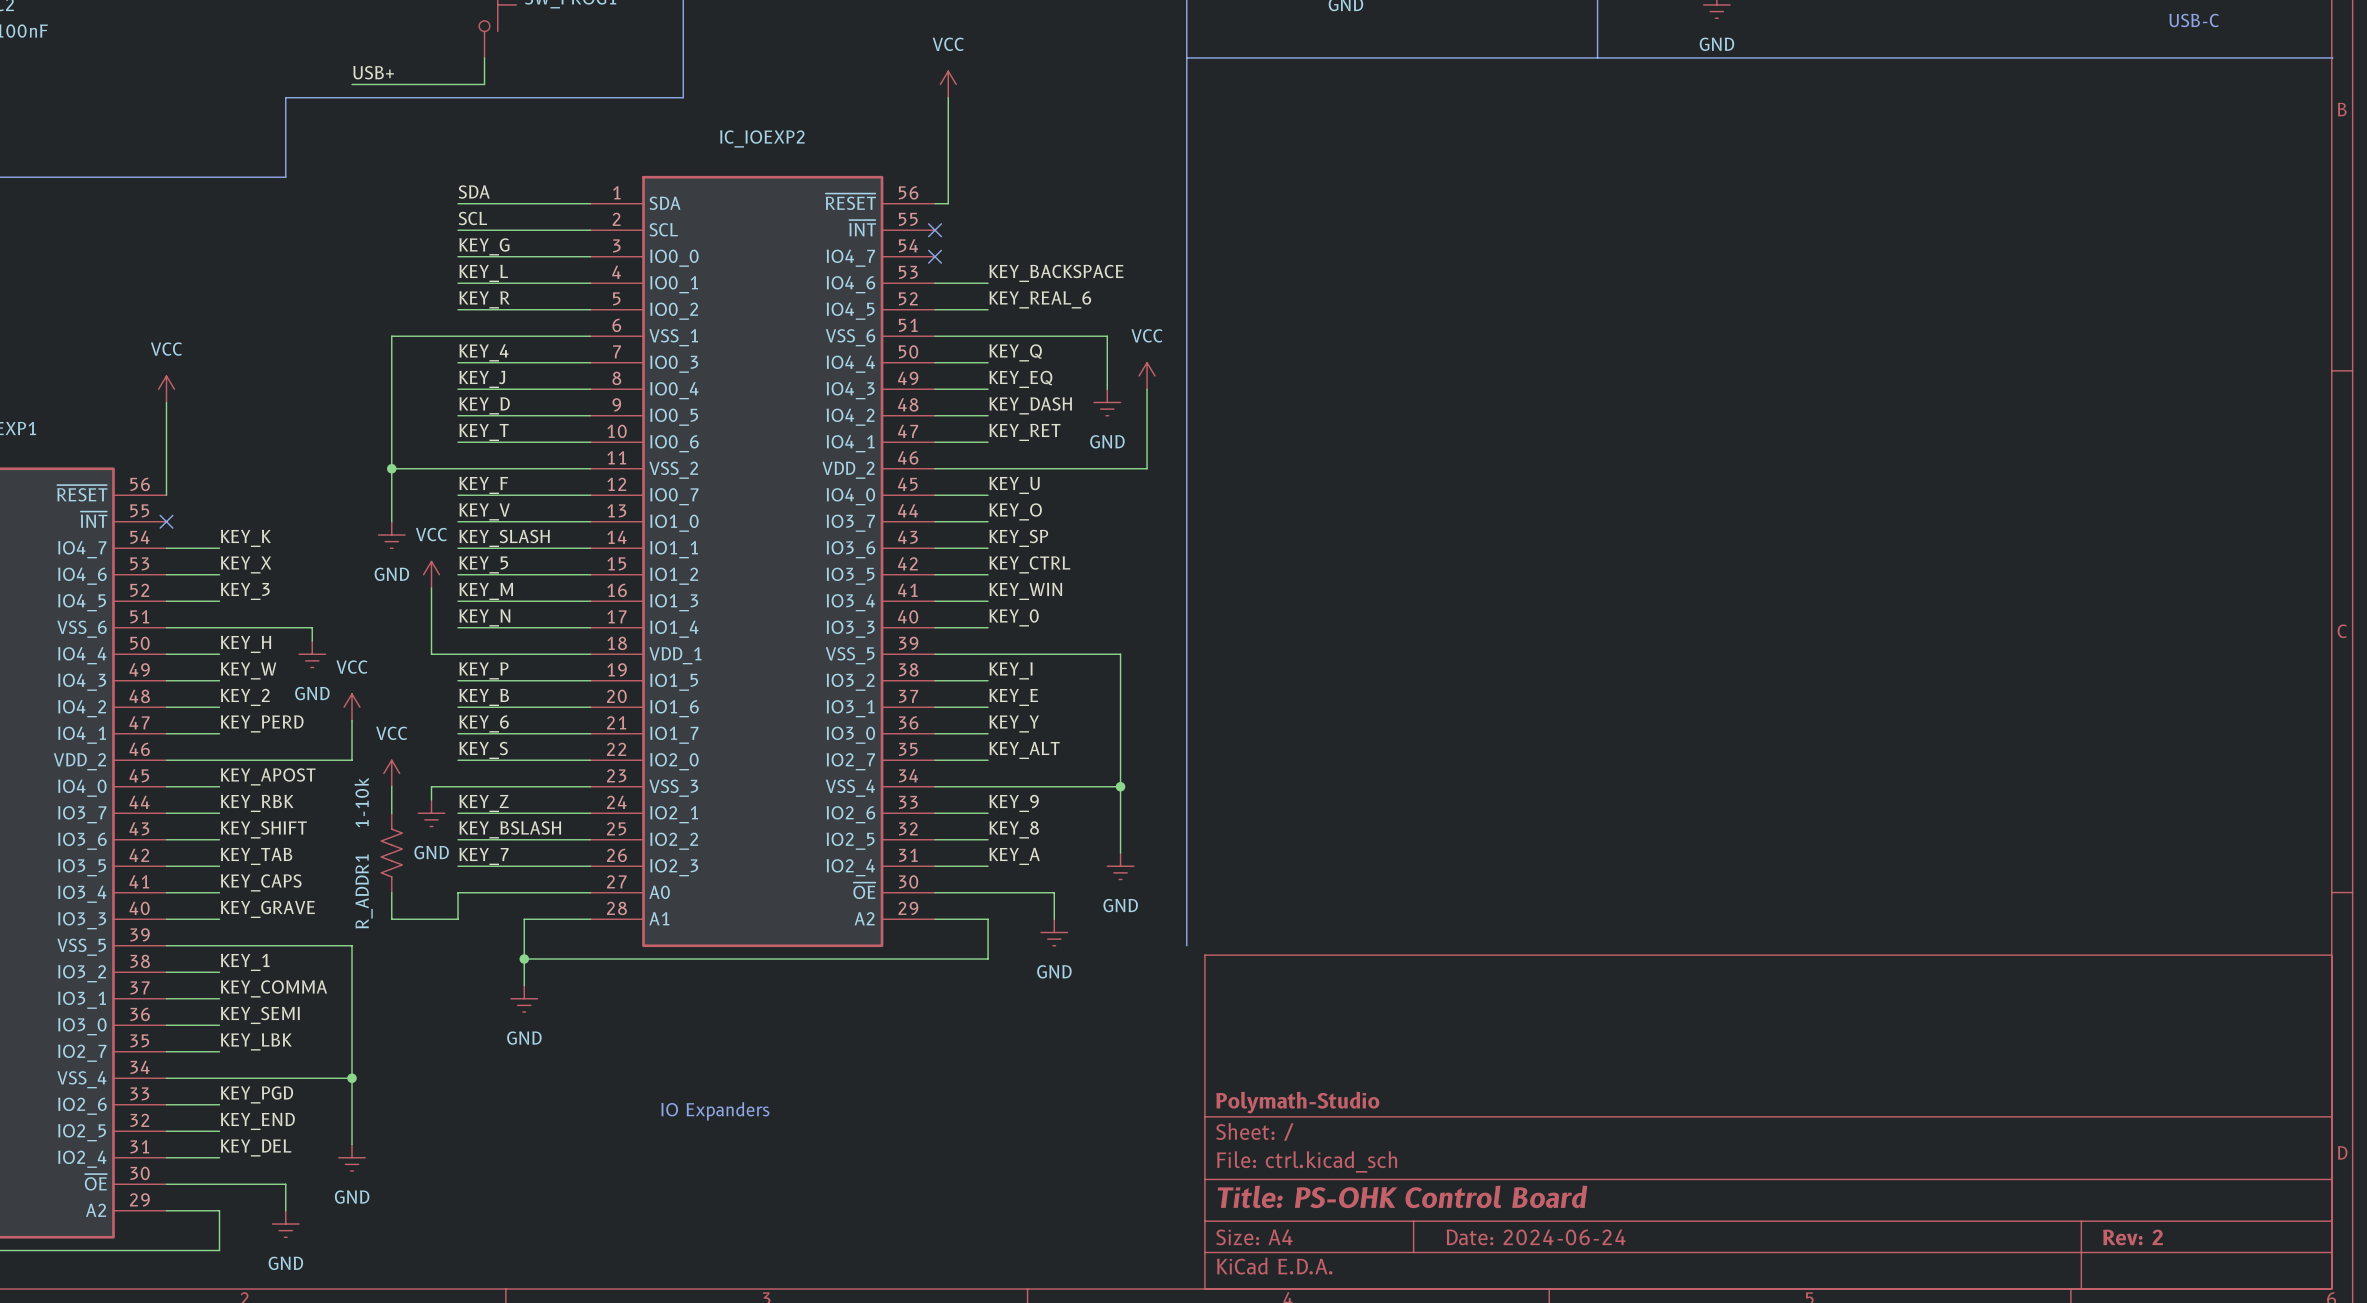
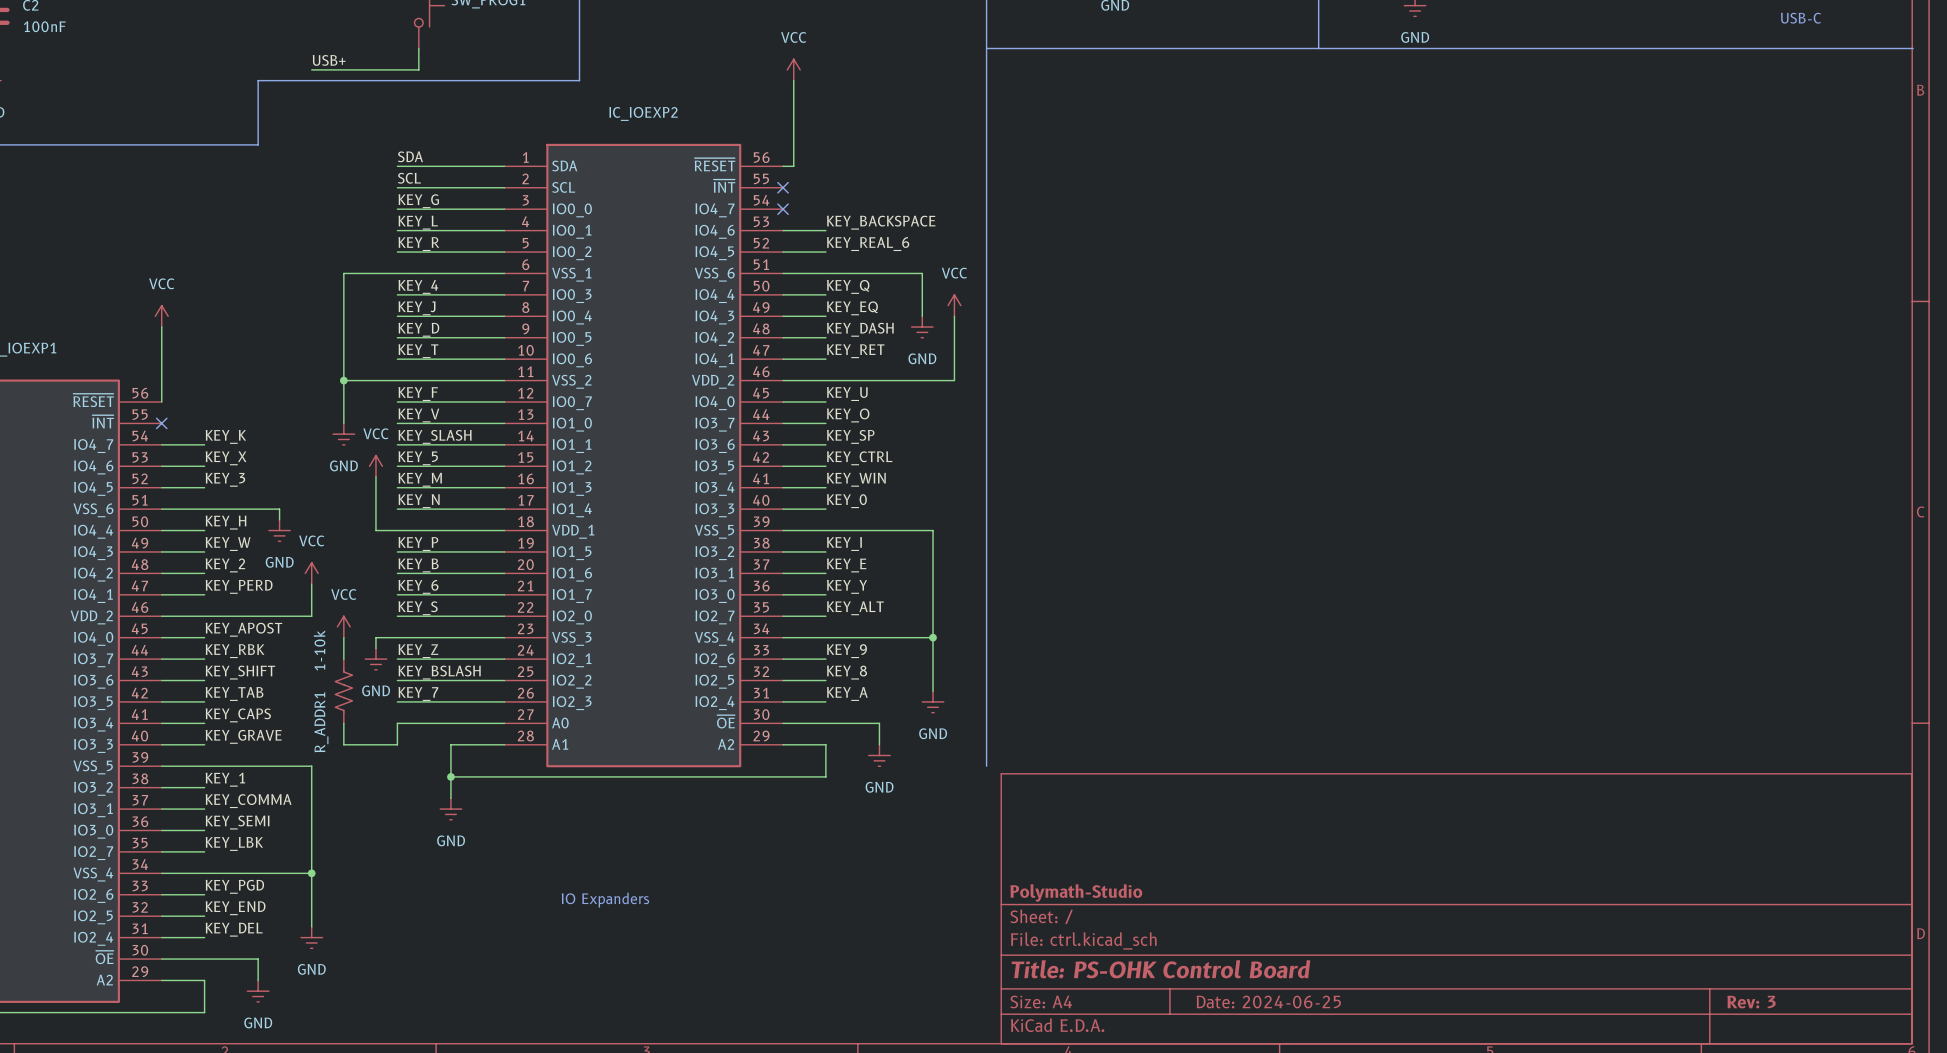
title block: Date: 2024-06-24 (1536, 1237) -> Date: 2024-06-25 (1268, 1001)
title block: Rev: 2 (2133, 1237) -> Rev: 3 (1751, 1002)

